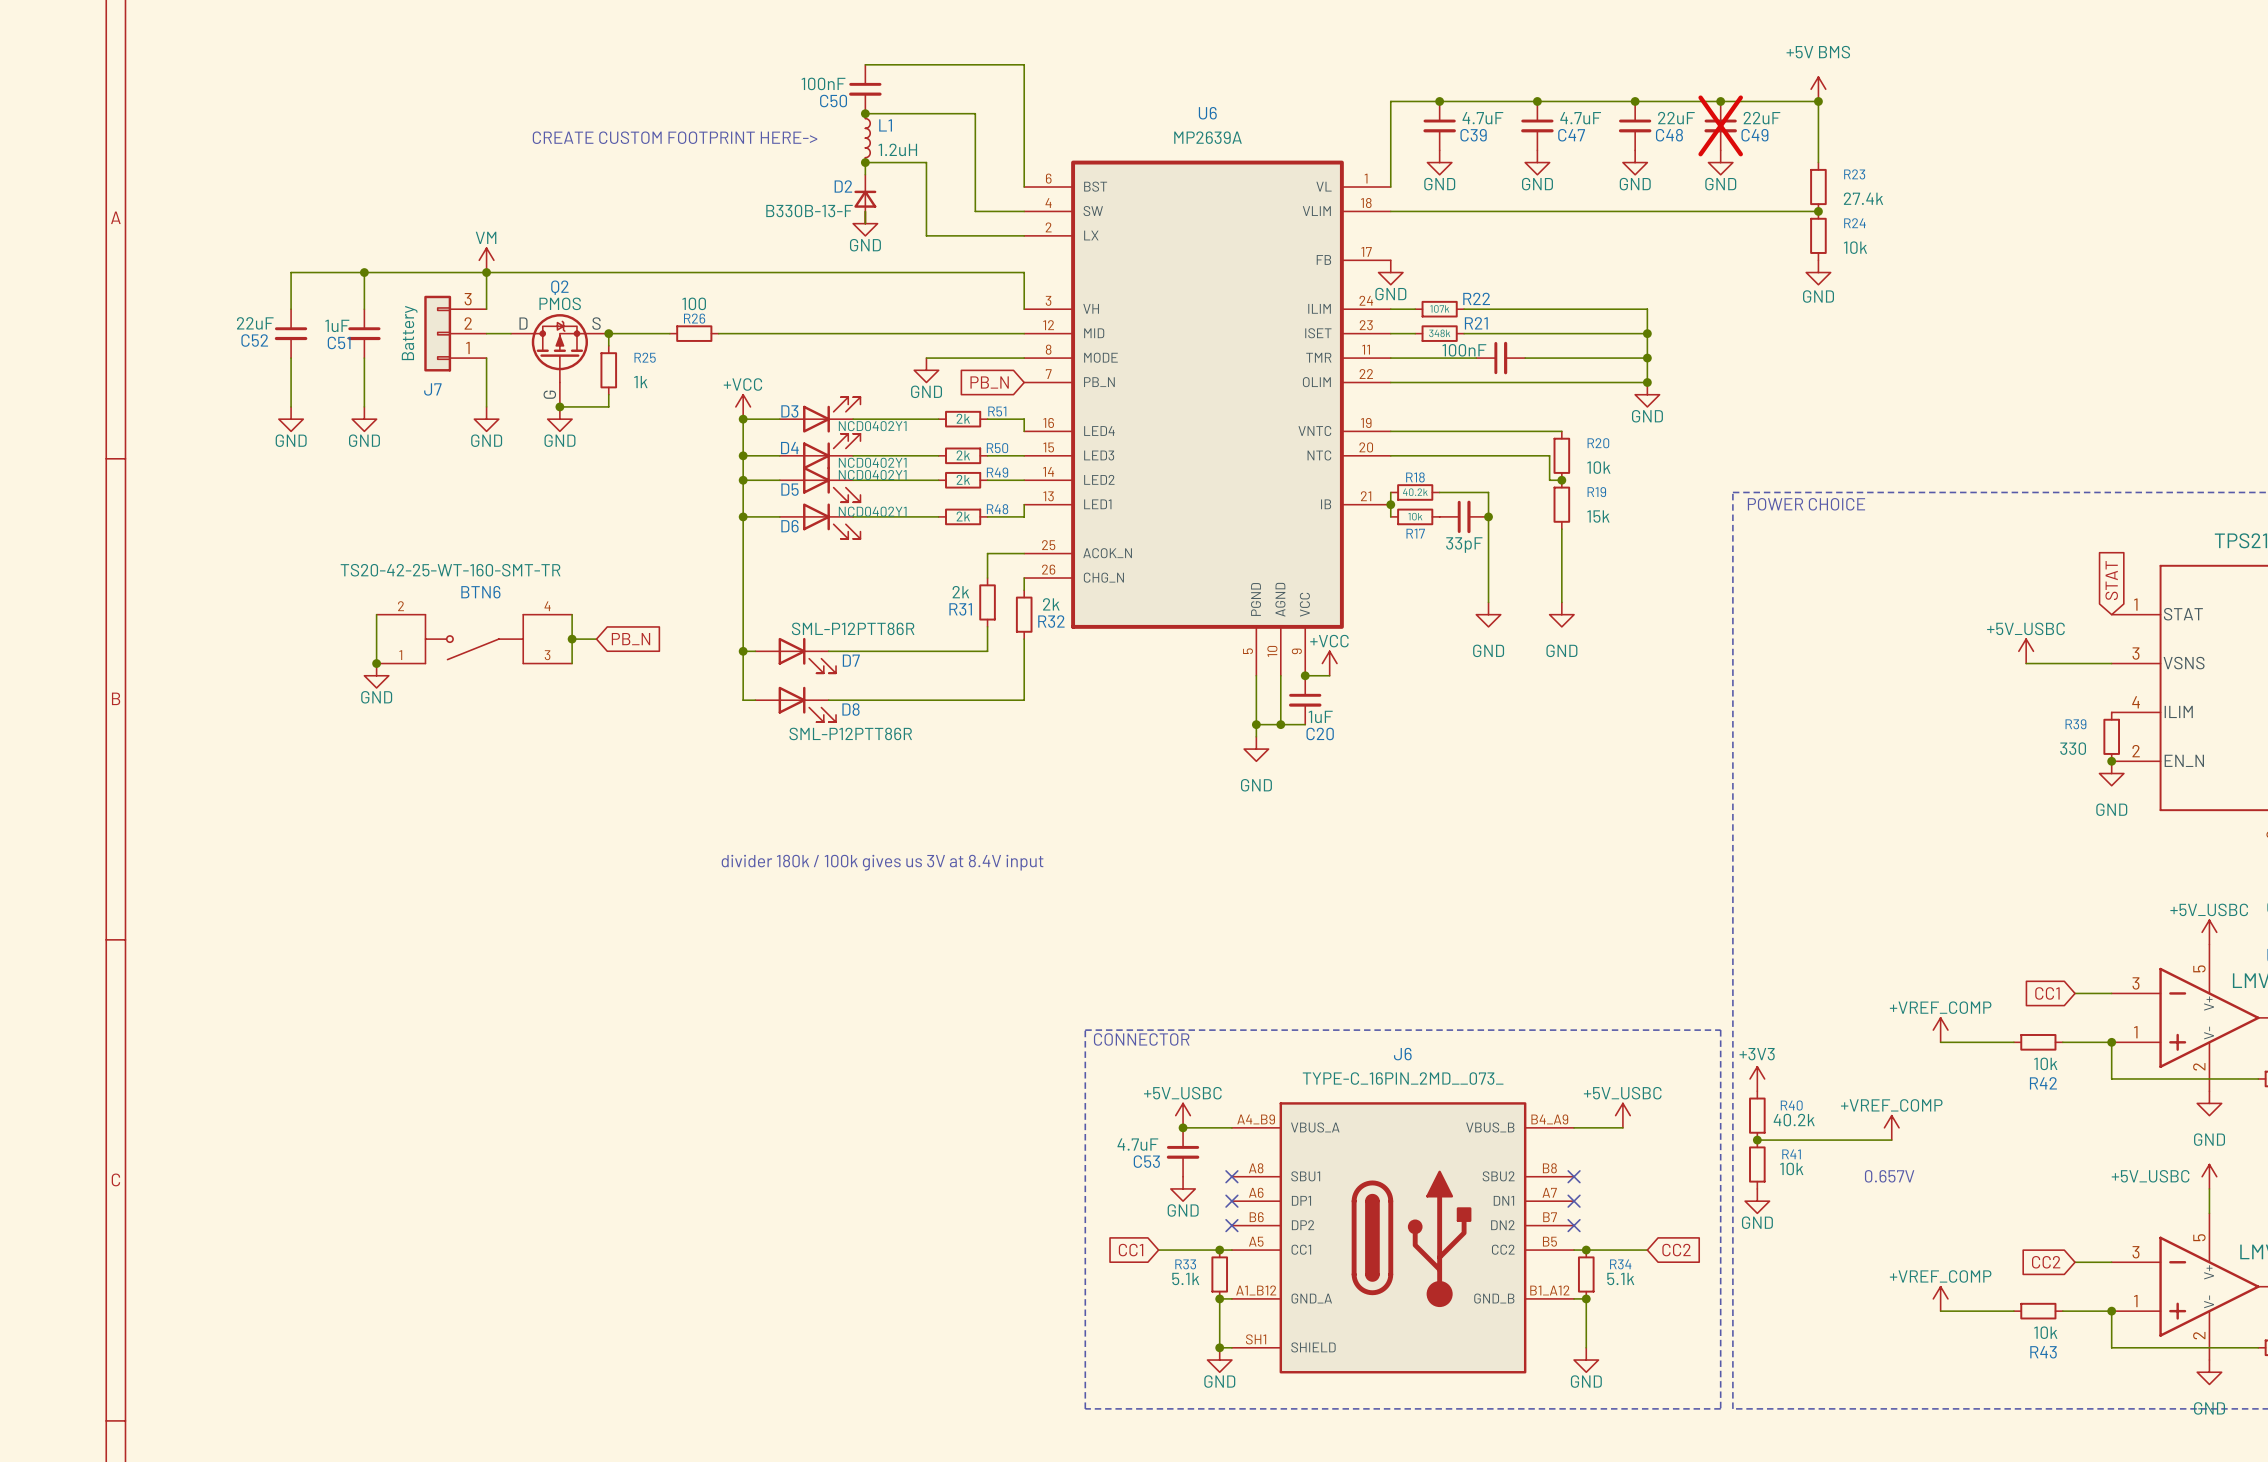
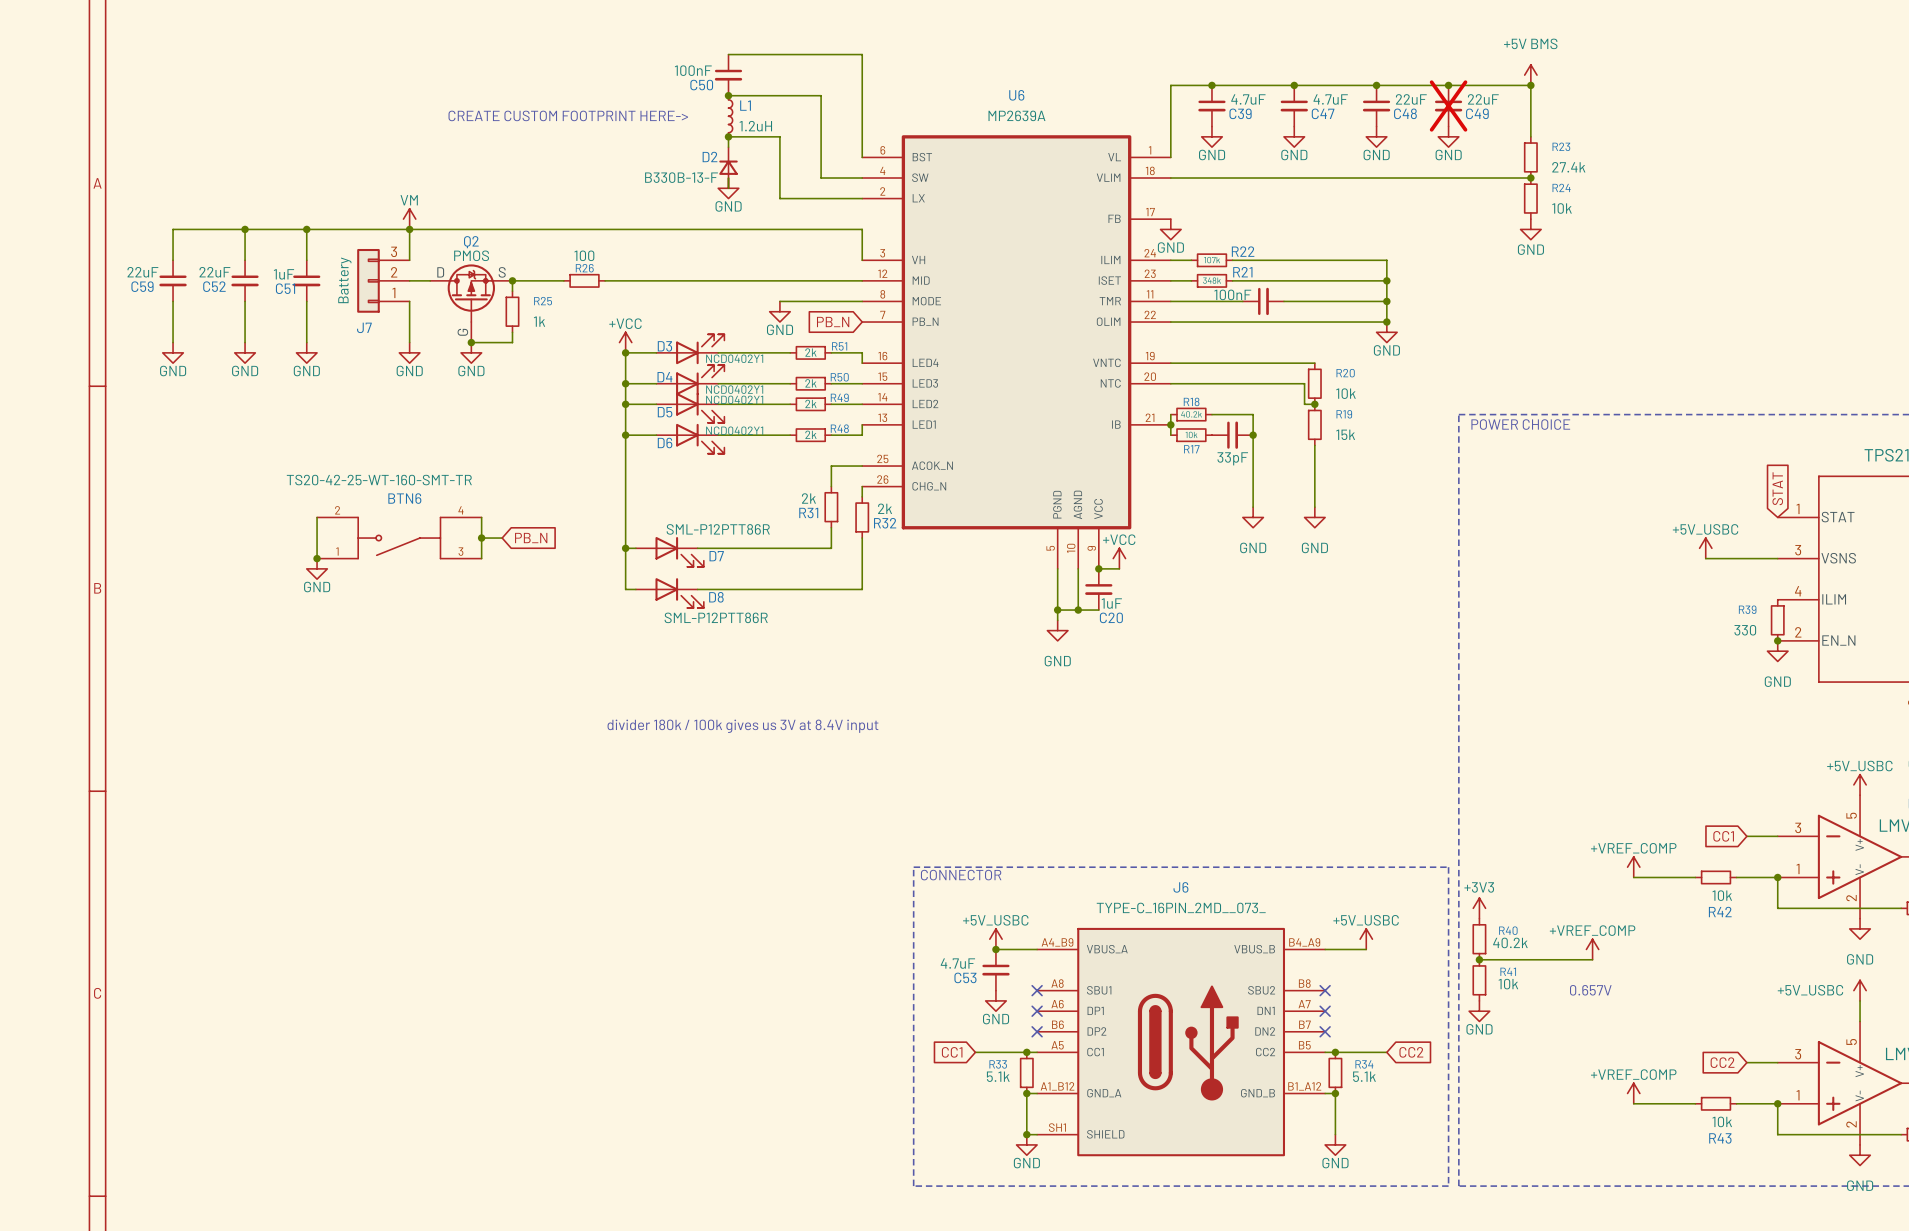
wire: none -> (245, 229) (173, 229) (173, 260)
junction: none -> (245, 229)
C59: none -> 22uF (173, 280)
wire: none -> (173, 301) (173, 342)
power symbol: none -> GND (173, 352)

